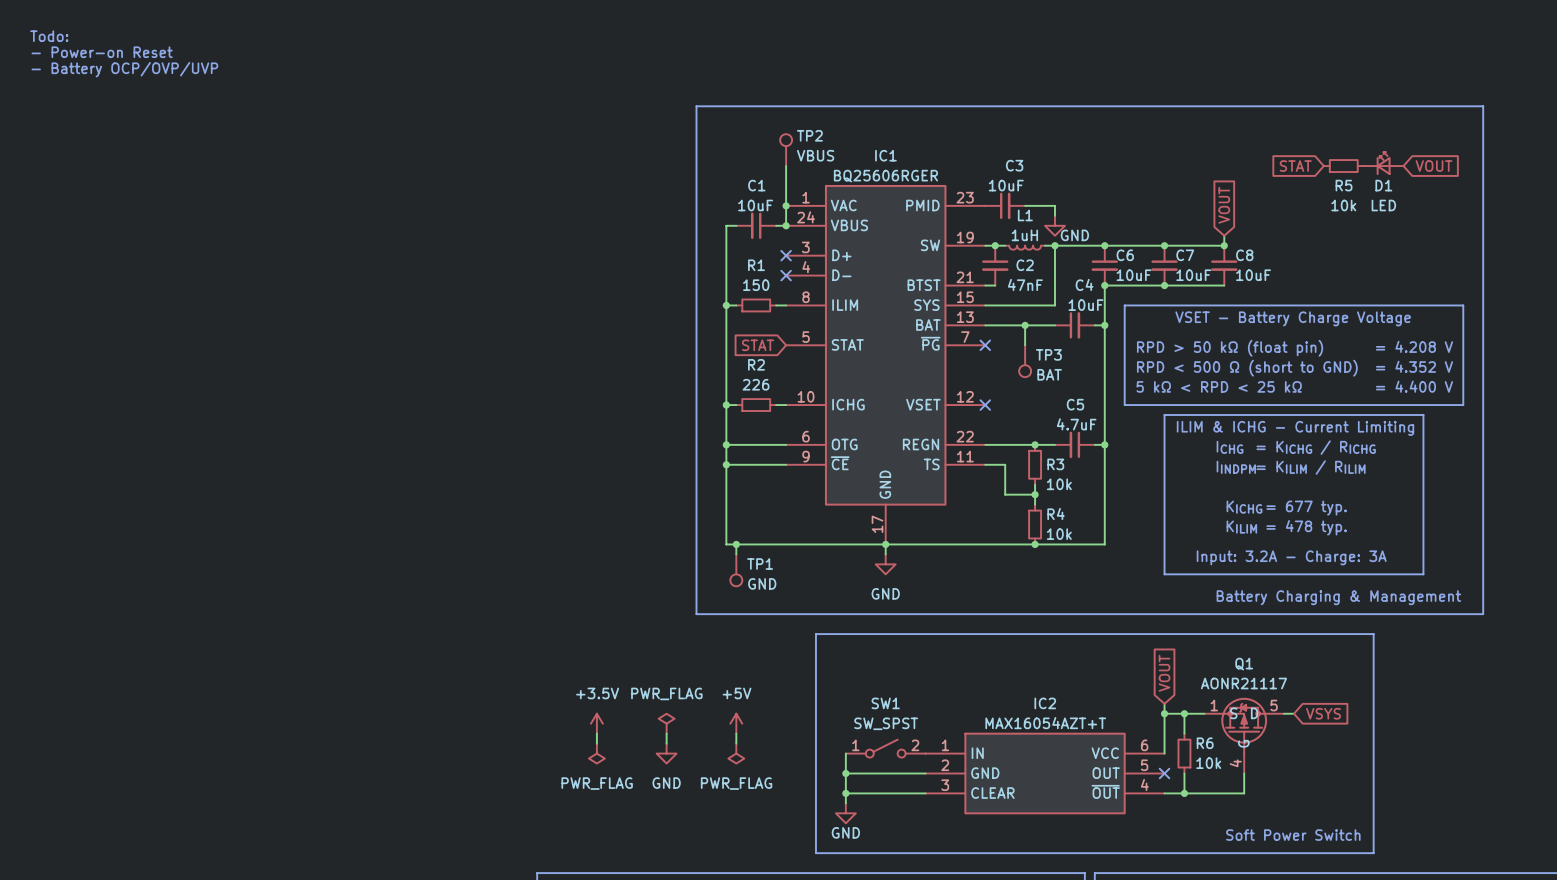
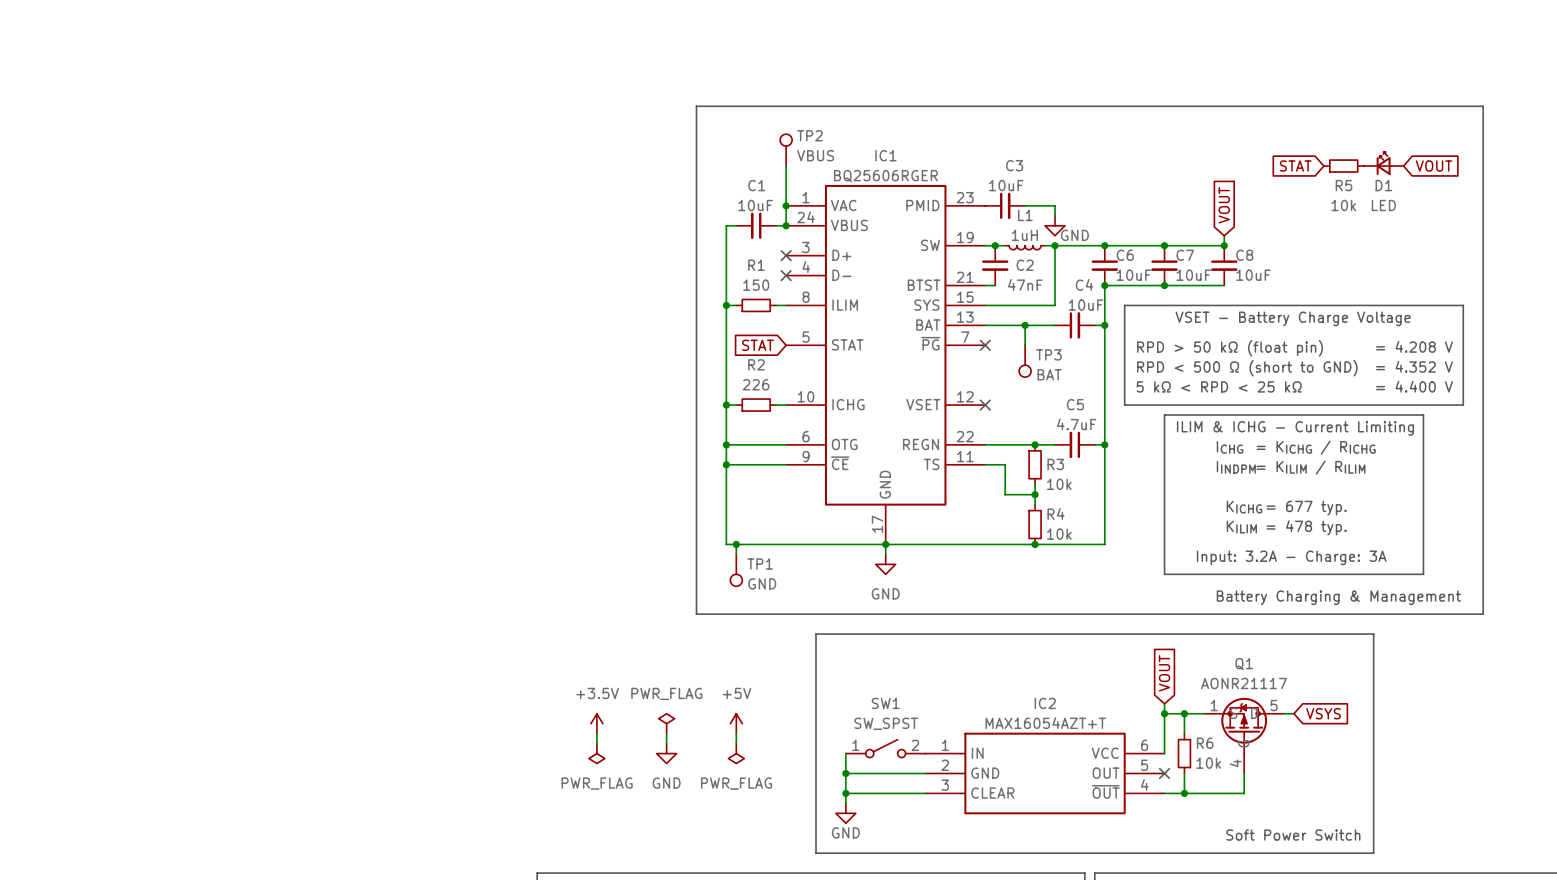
text: Todo: (49, 36) -> none
text: - Power-on Reset (102, 52) -> none
text: - Battery OCP/OVP/UVP (124, 69) -> none

